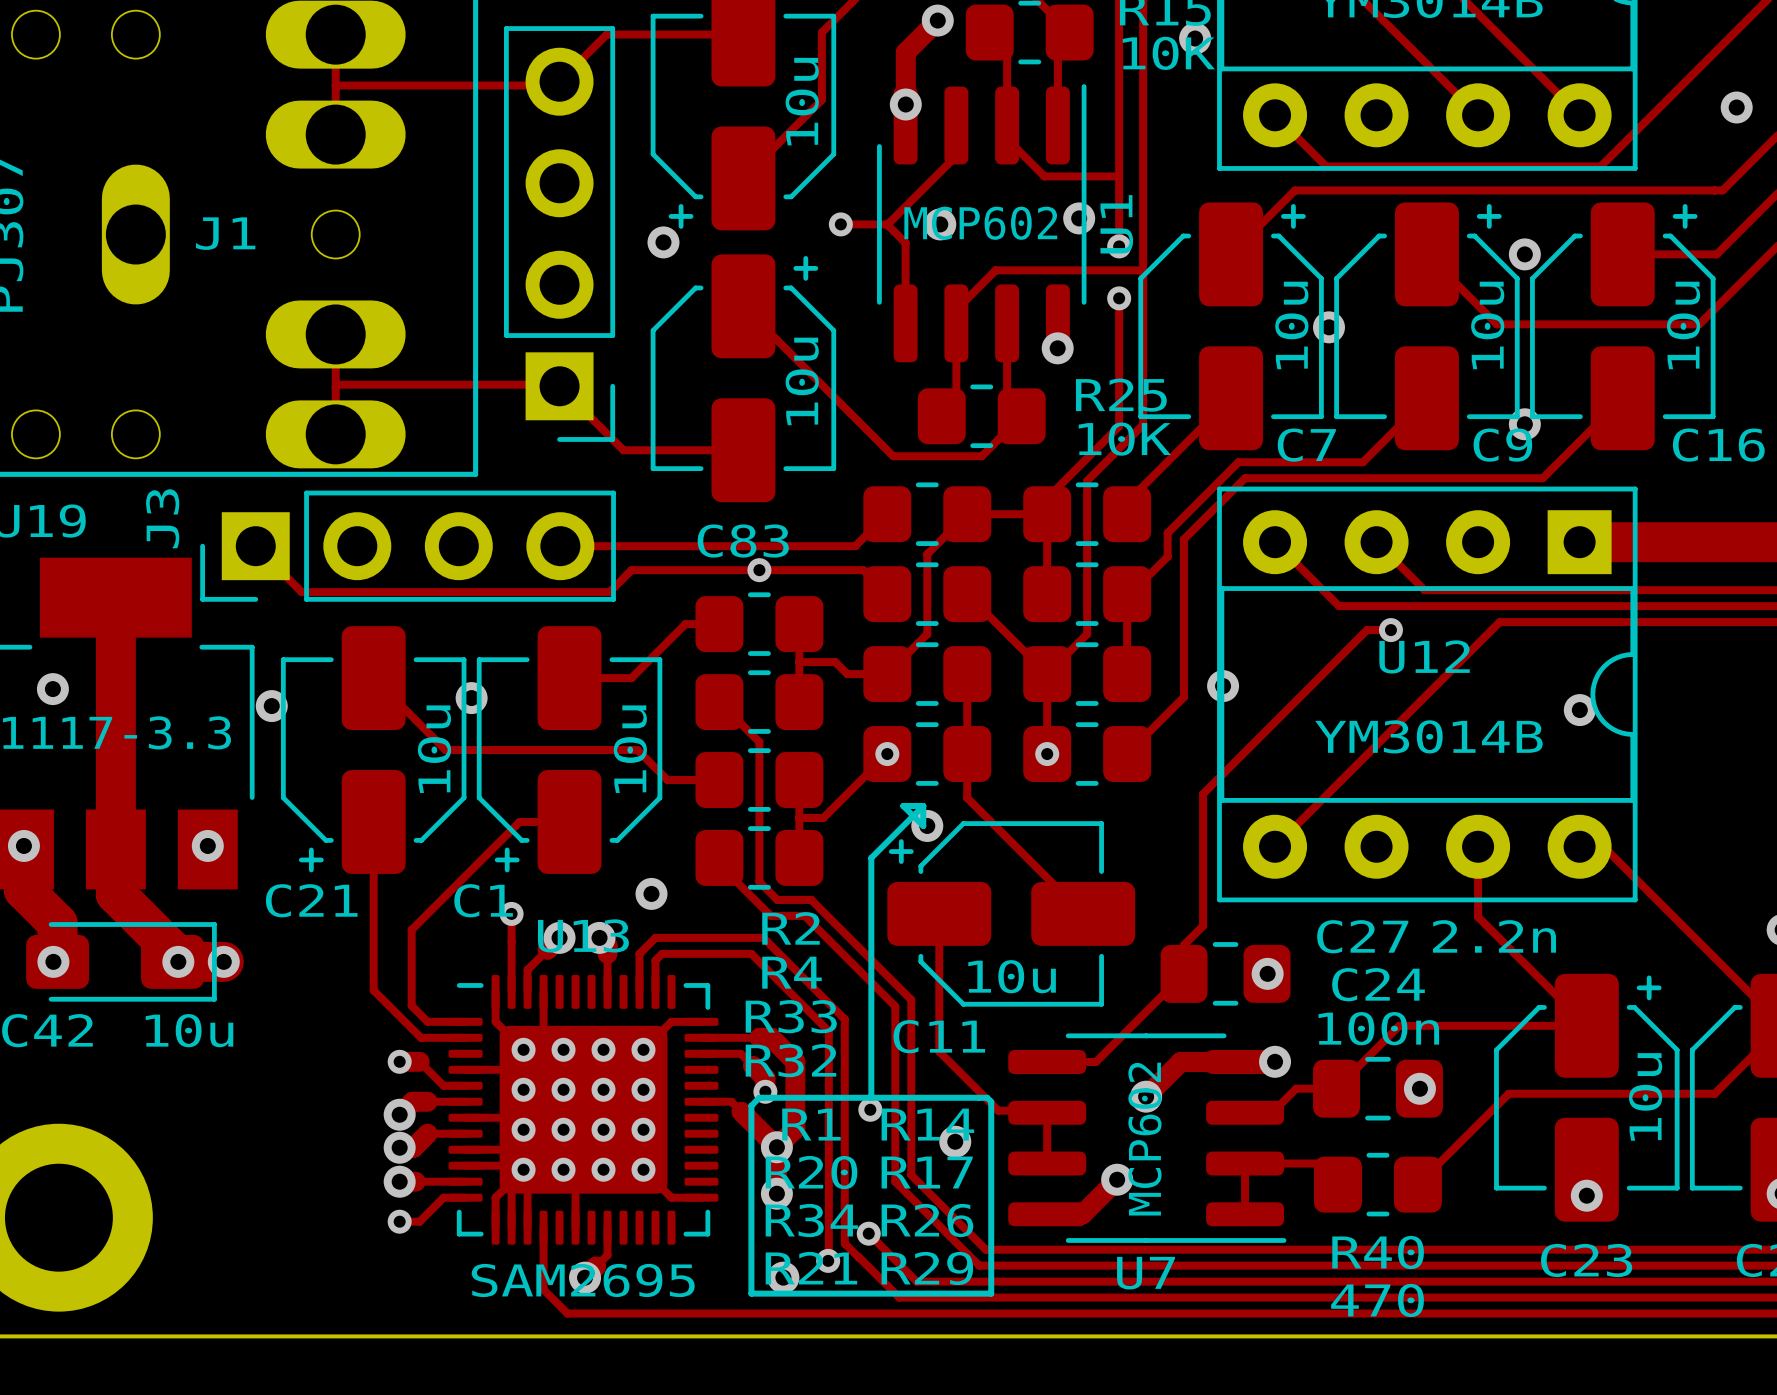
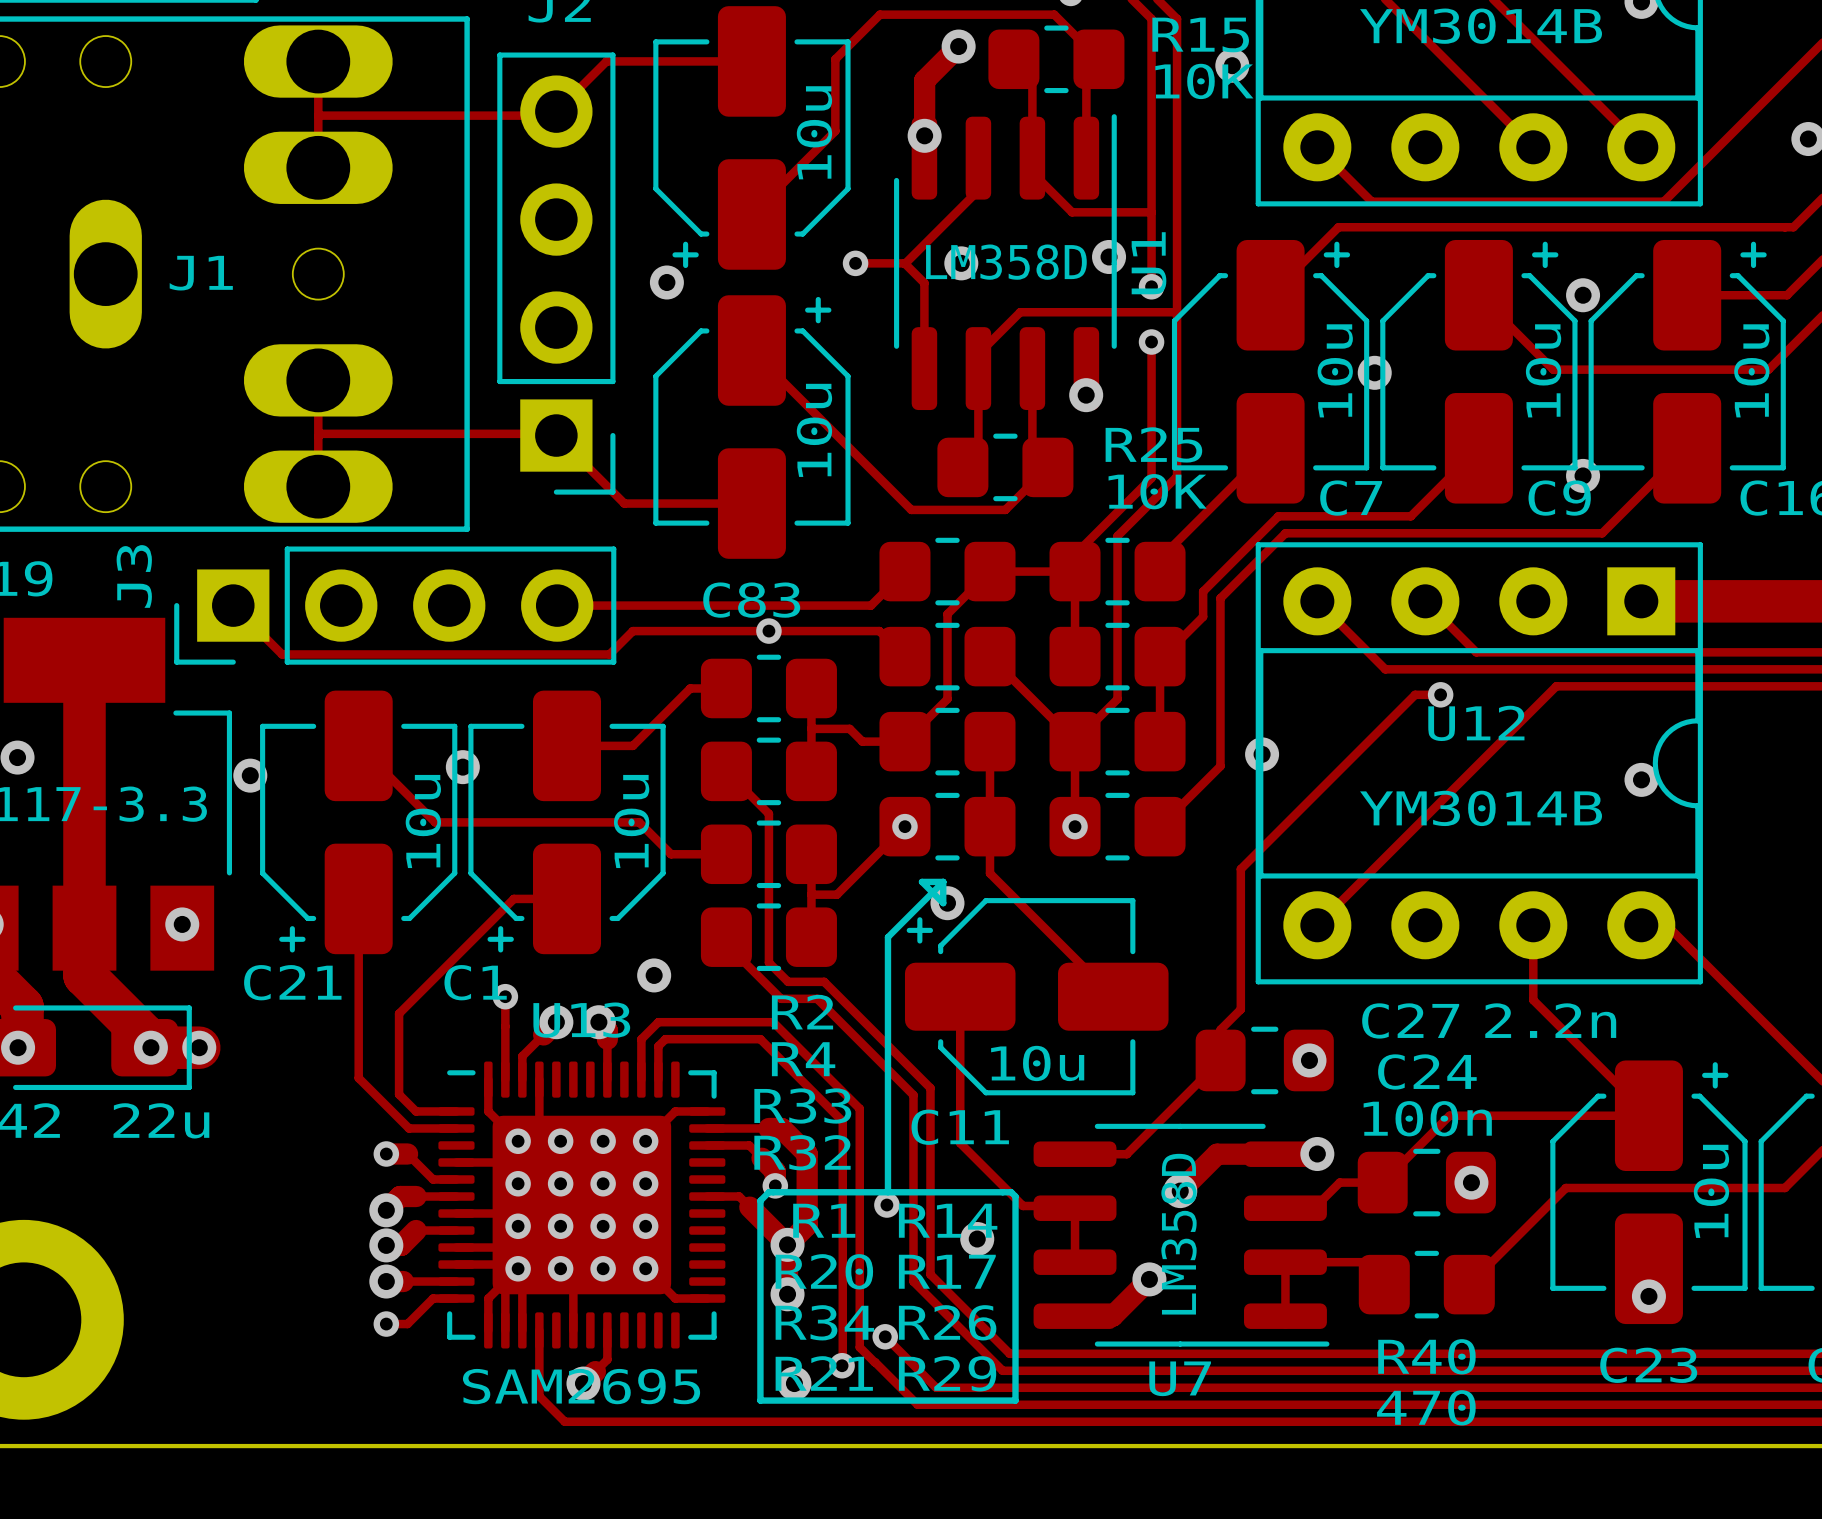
U1 value: MCP602 (980, 223) -> LM358D (1006, 262)
C42 value: 10u (189, 1030) -> 22u (161, 1120)
U7 value: MCP602 (1144, 1139) -> LM358D (1179, 1234)

